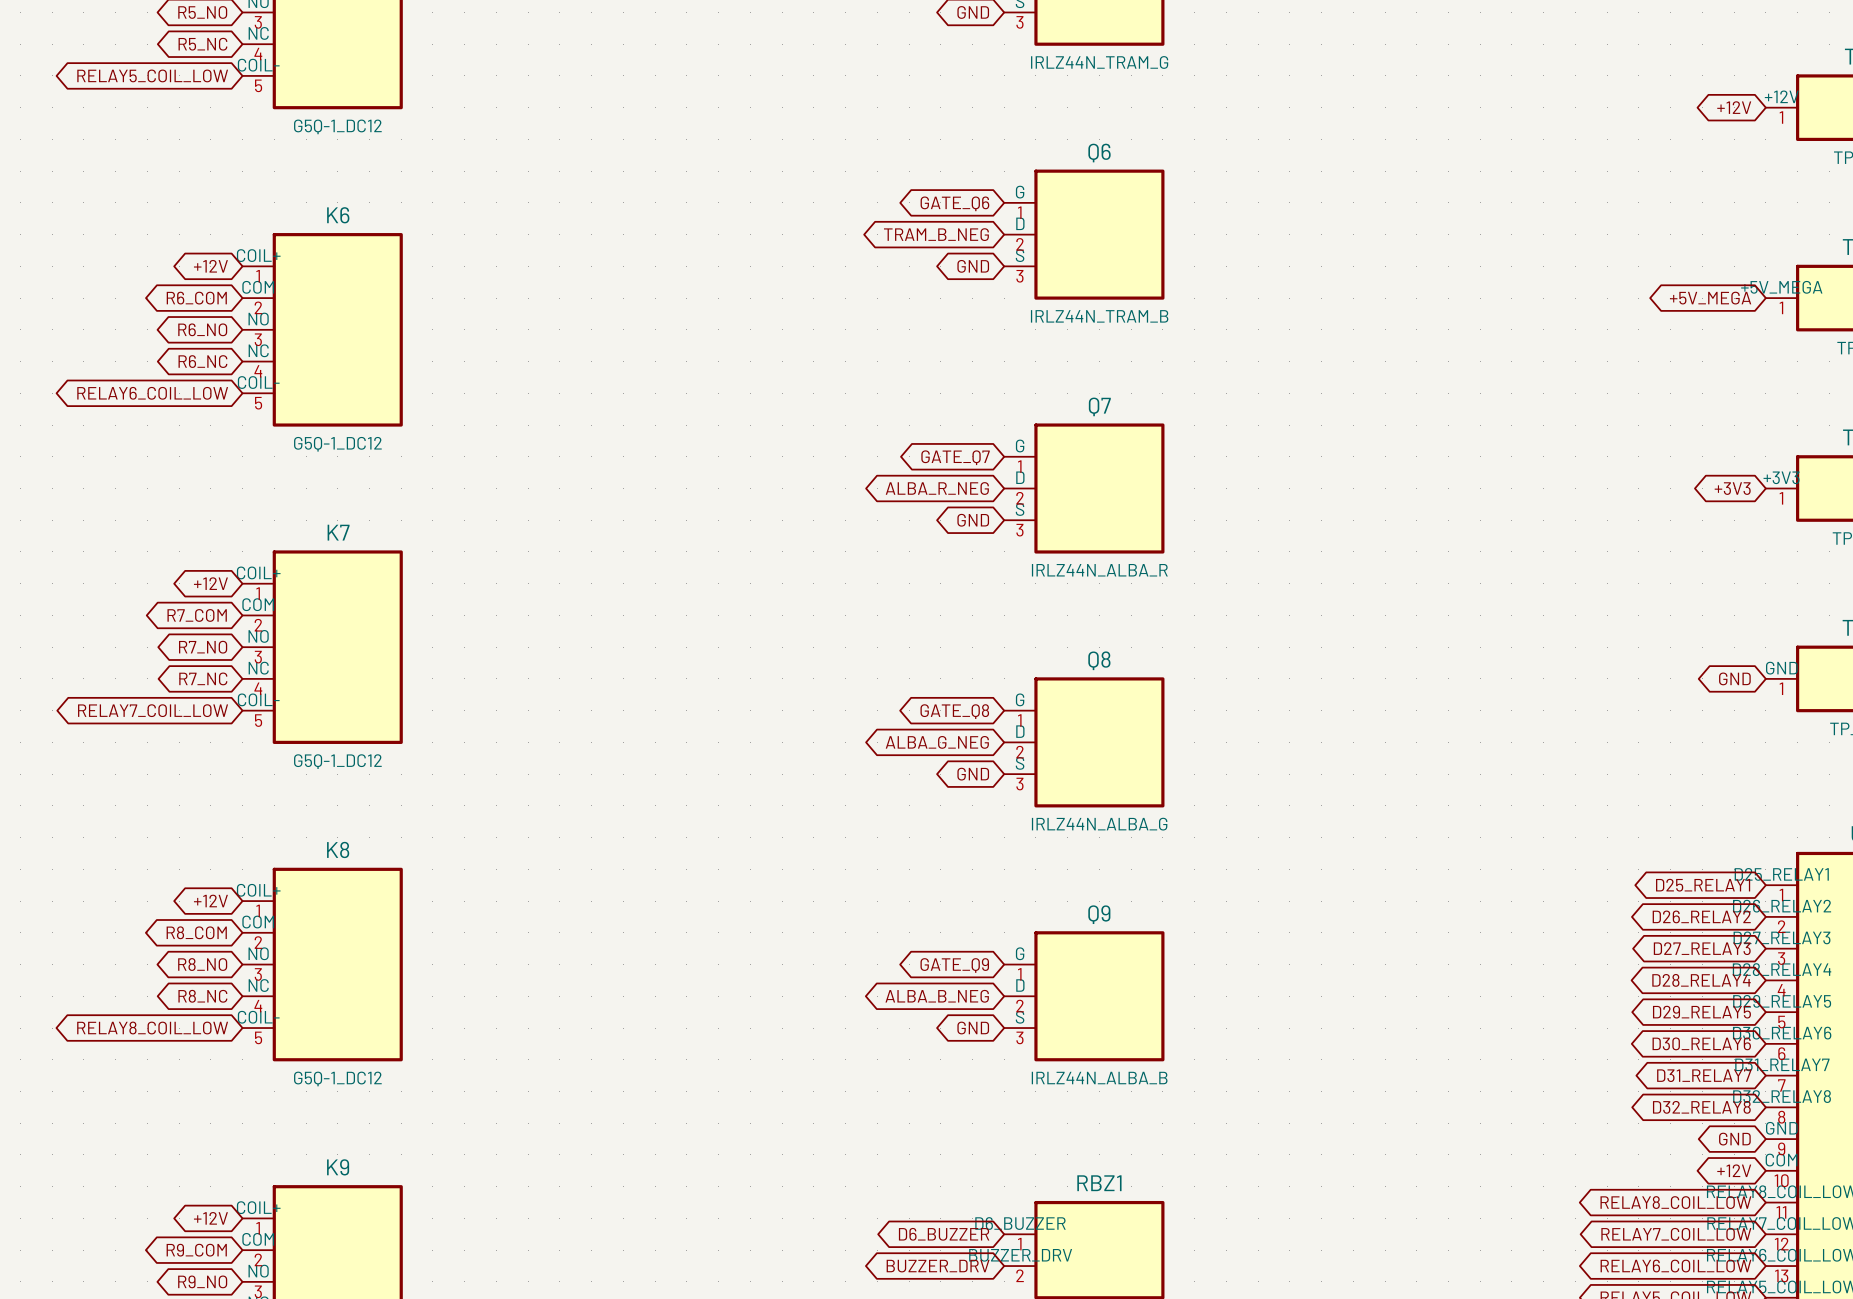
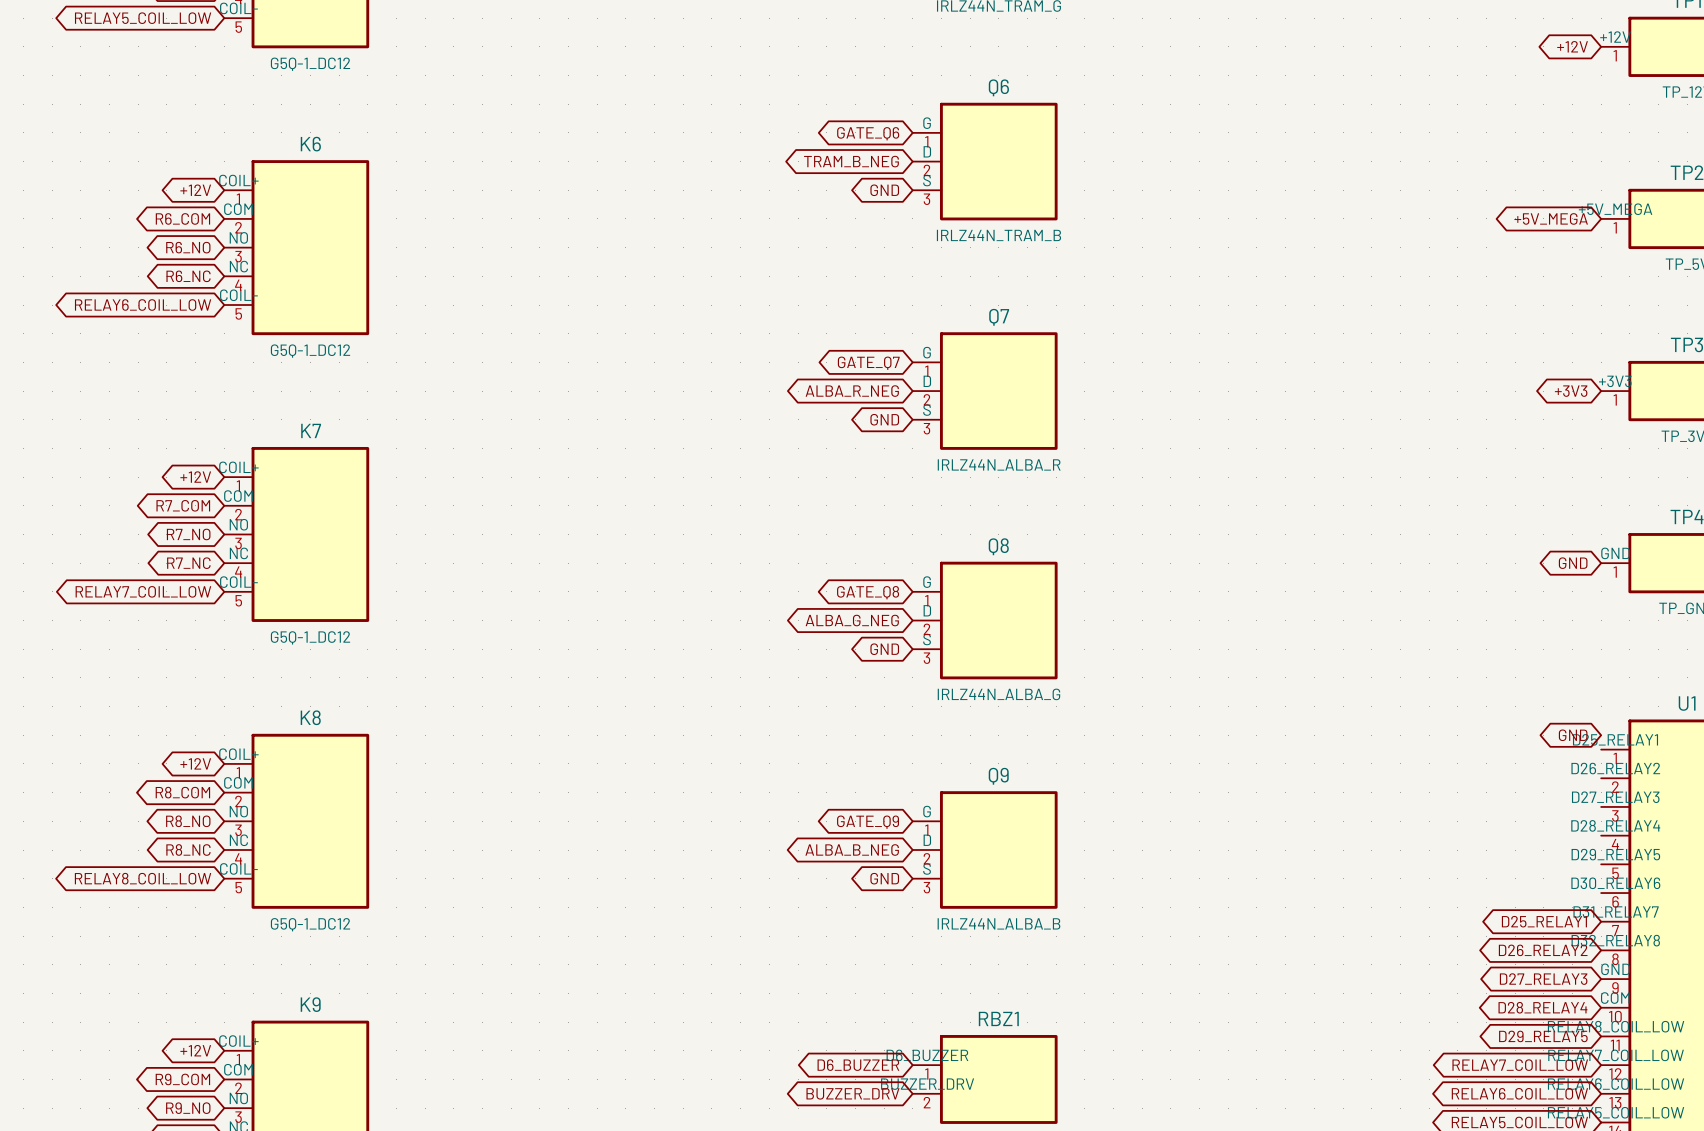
global label: none -> GND (1573, 735)
global label: D25_RELAY1 (1703, 885) -> none
global label: D26_RELAY2 (1701, 916) -> none
global label: D27_RELAY3 (1702, 948) -> none
global label: D28_RELAY4 (1701, 980) -> none
global label: D29_RELAY5 (1701, 1012) -> none
global label: D30_RELAY6 (1701, 1043) -> none
global label: D31_RELAY7 (1704, 1075) -> D25_RELAY1 (1544, 921)
global label: D32_RELAY8 (1701, 1107) -> D26_RELAY2 (1543, 950)
global label: GND (1734, 1139) -> D27_RELAY3 (1543, 979)
global label: +12V (1734, 1170) -> D28_RELAY4 (1542, 1007)
global label: RELAY8_COIL_LOW (1675, 1202) -> D29_RELAY5 (1543, 1036)

